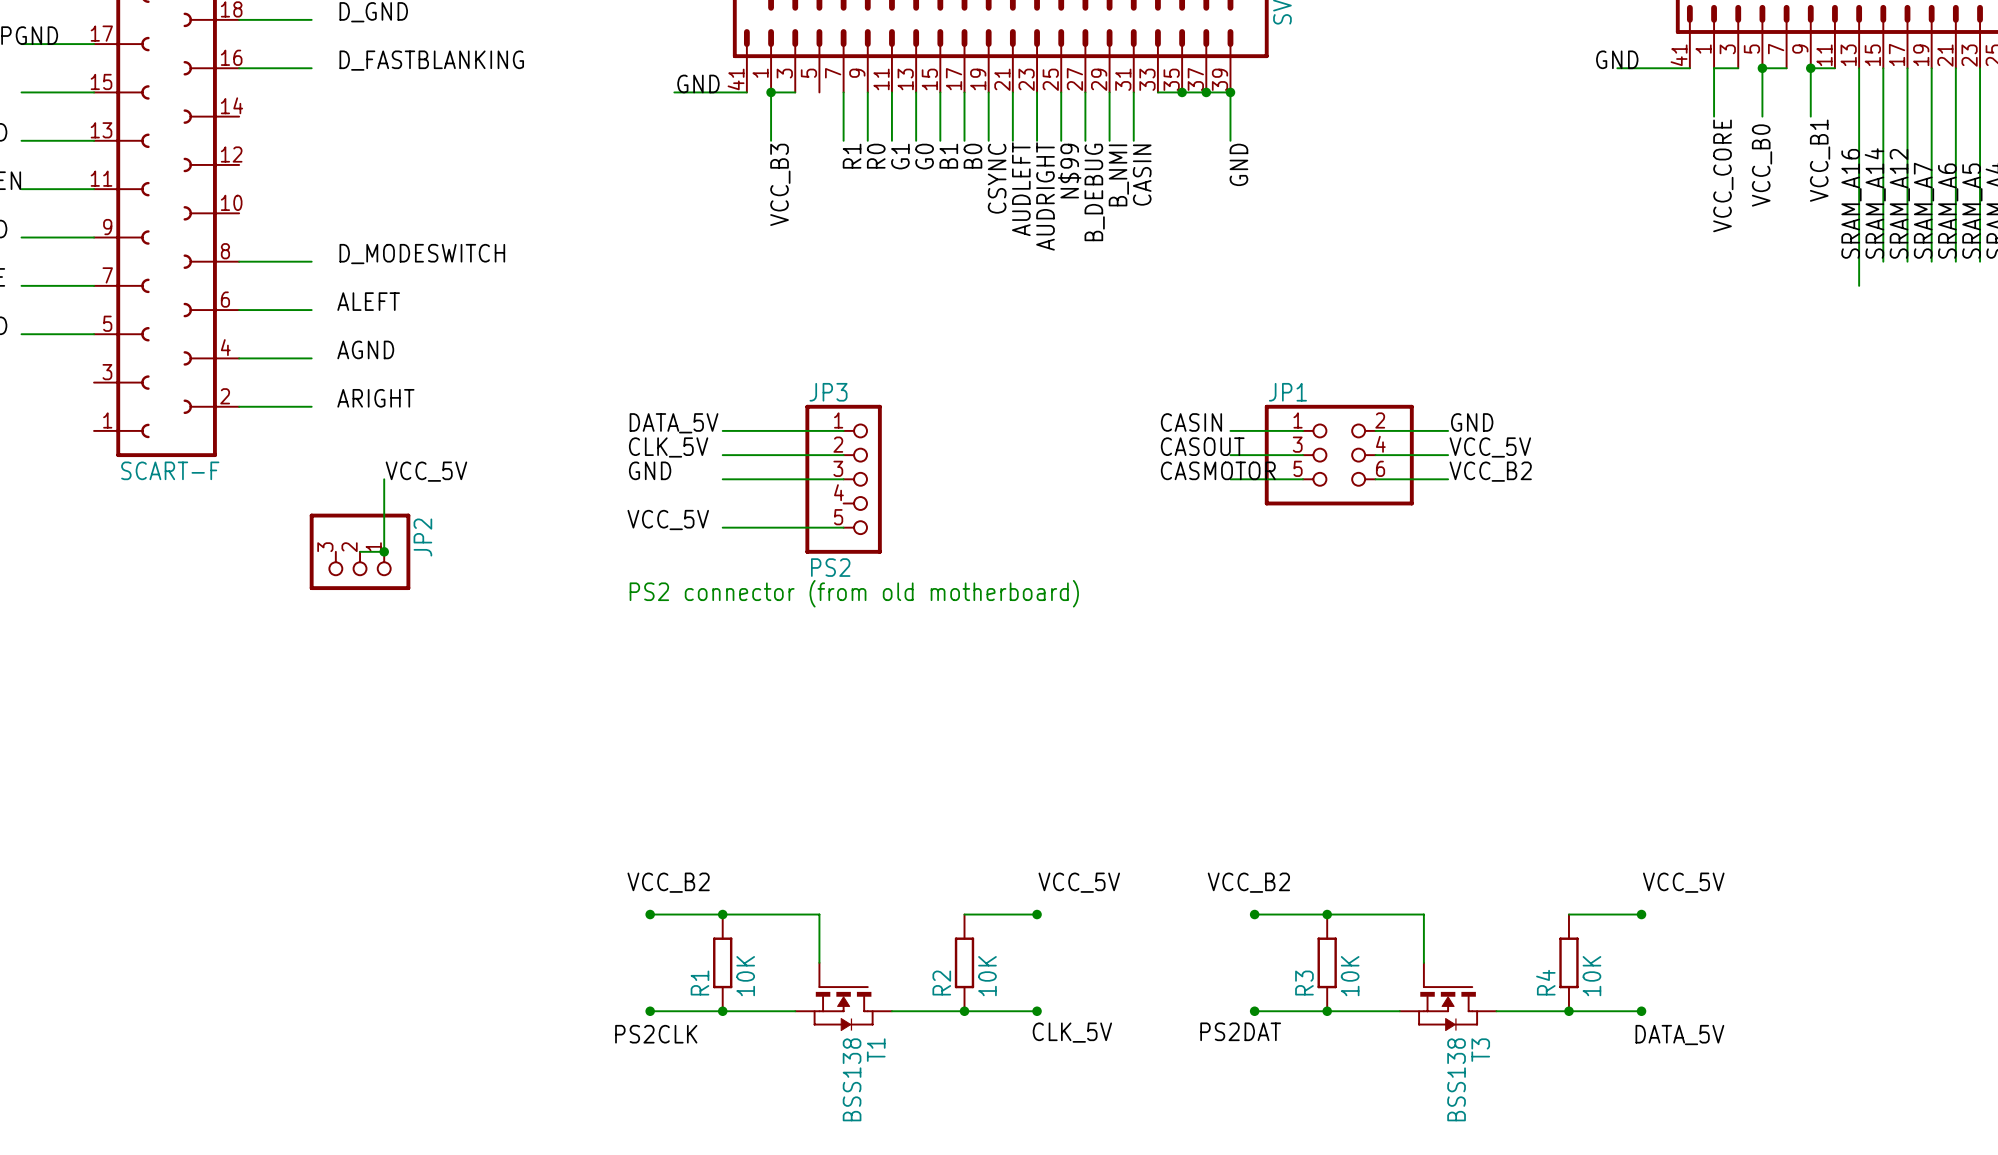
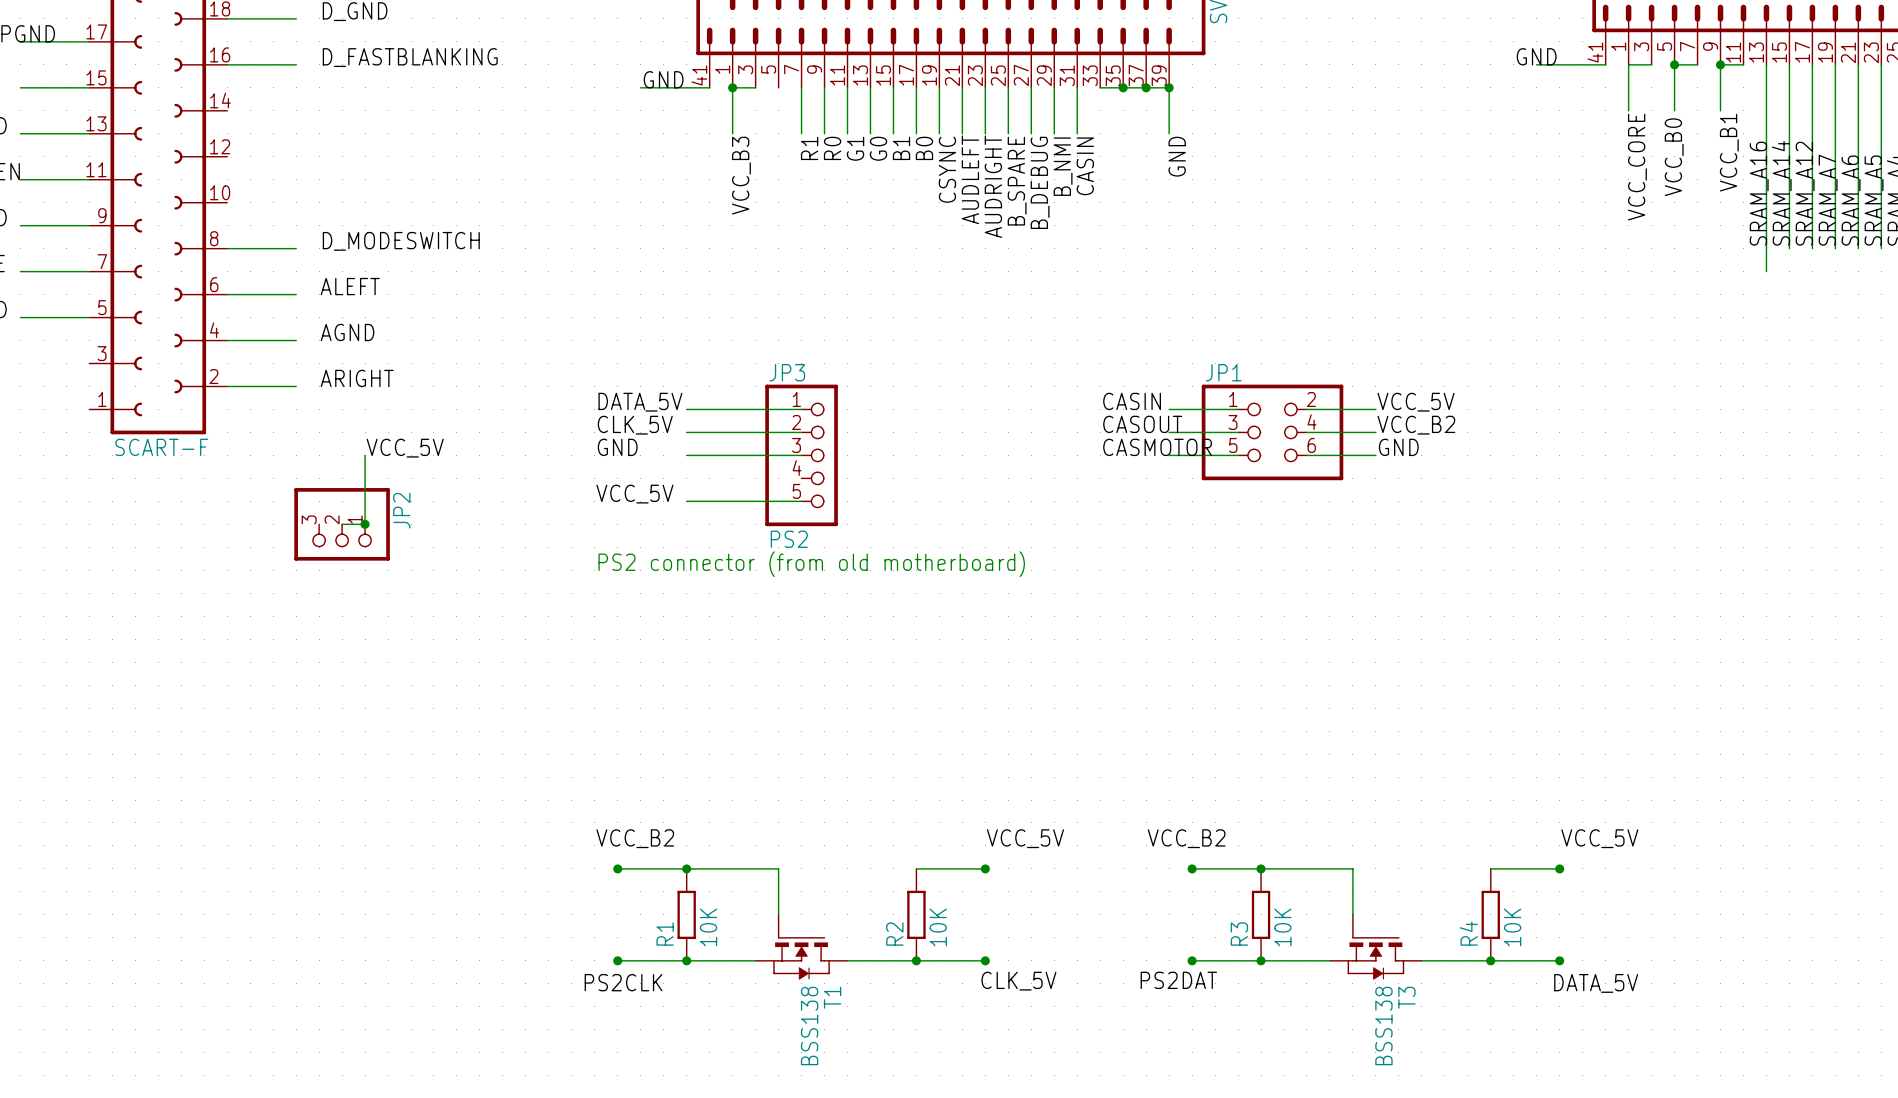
label: N$99 (1069, 171) -> B_SPARE (1017, 181)
label: GND (1472, 422) -> VCC_5V (1416, 402)
label: VCC_5V (1490, 447) -> VCC_B2 (1416, 425)
label: VCC_B2 (1490, 471) -> GND (1398, 447)

